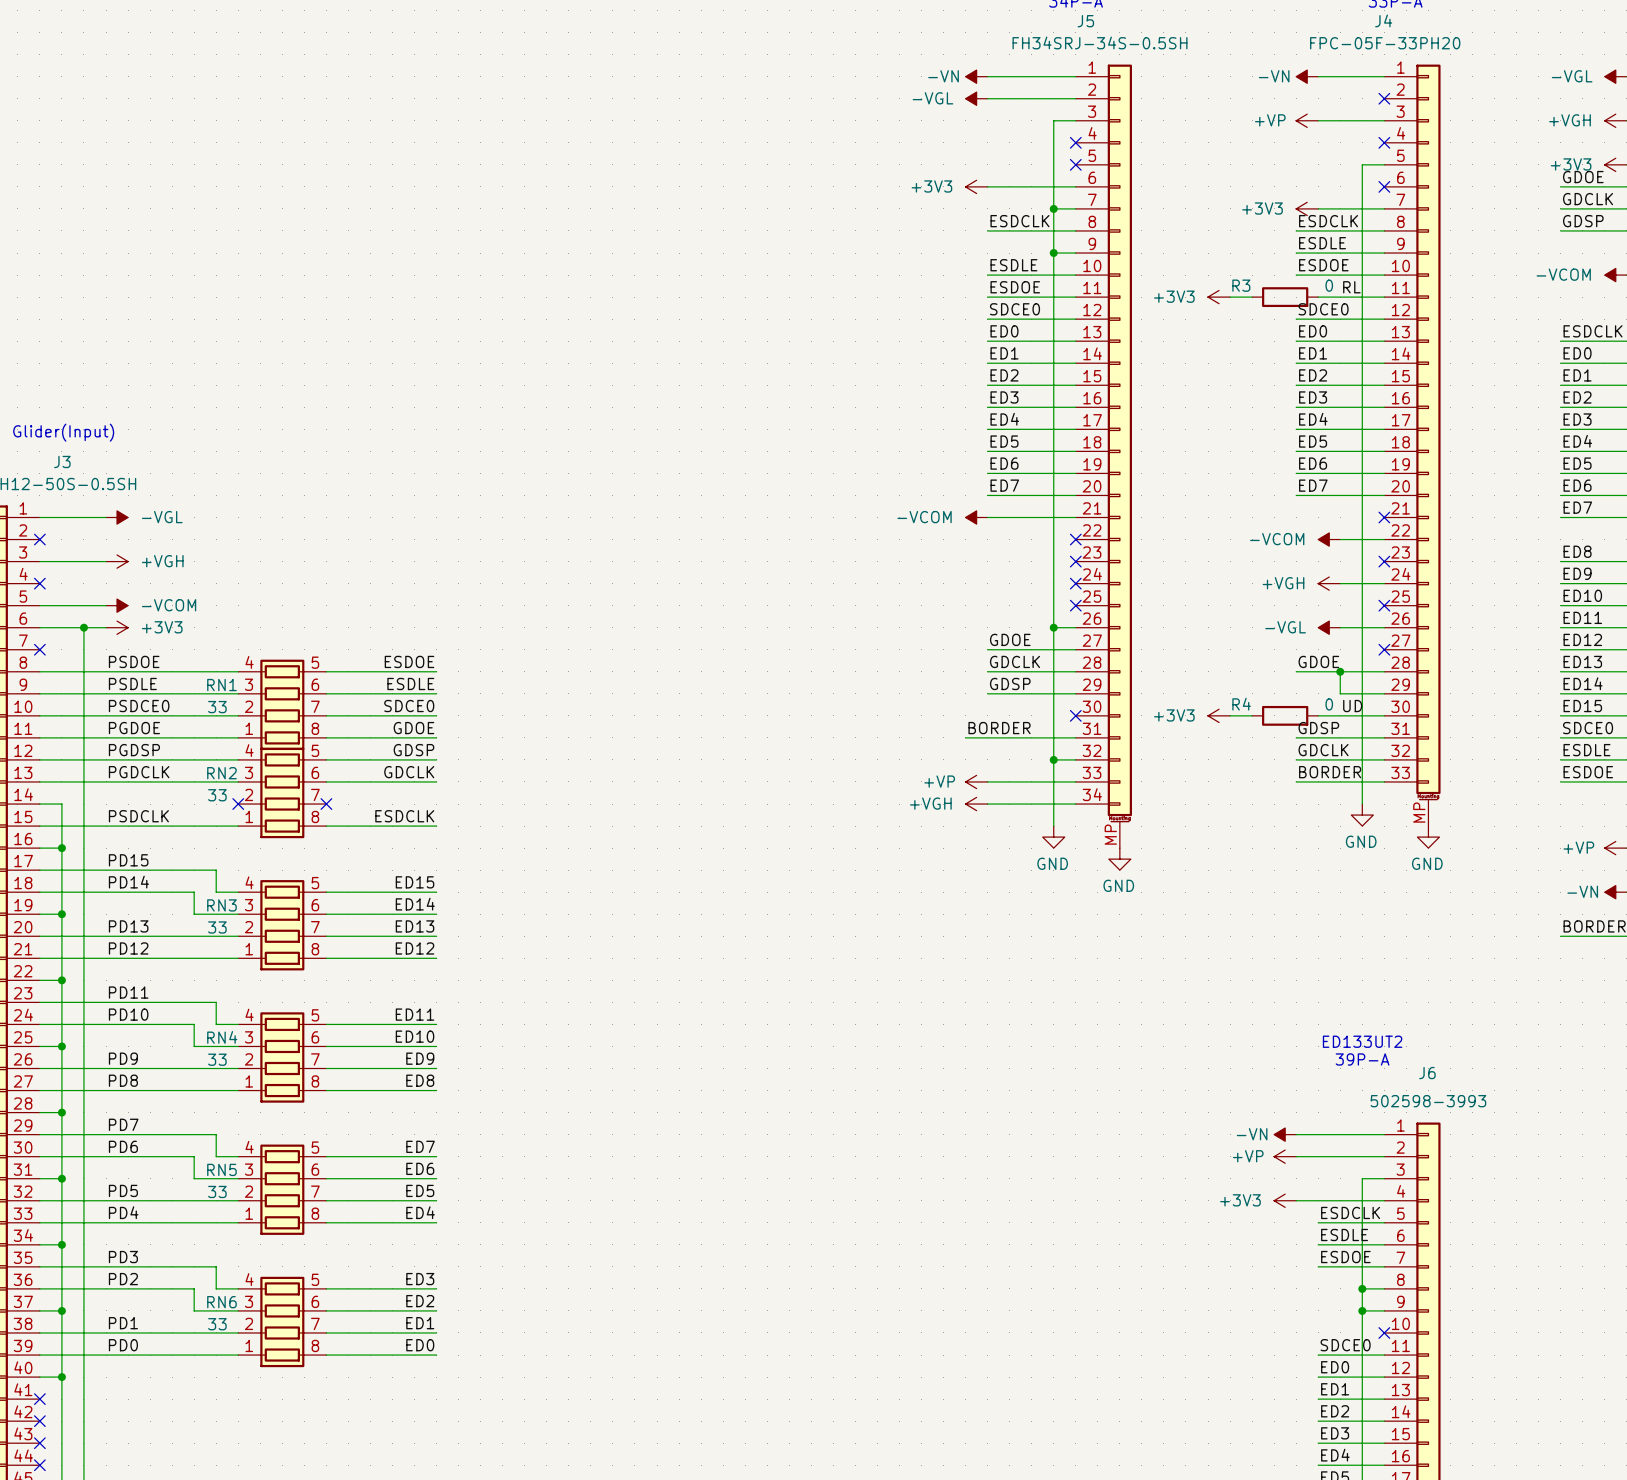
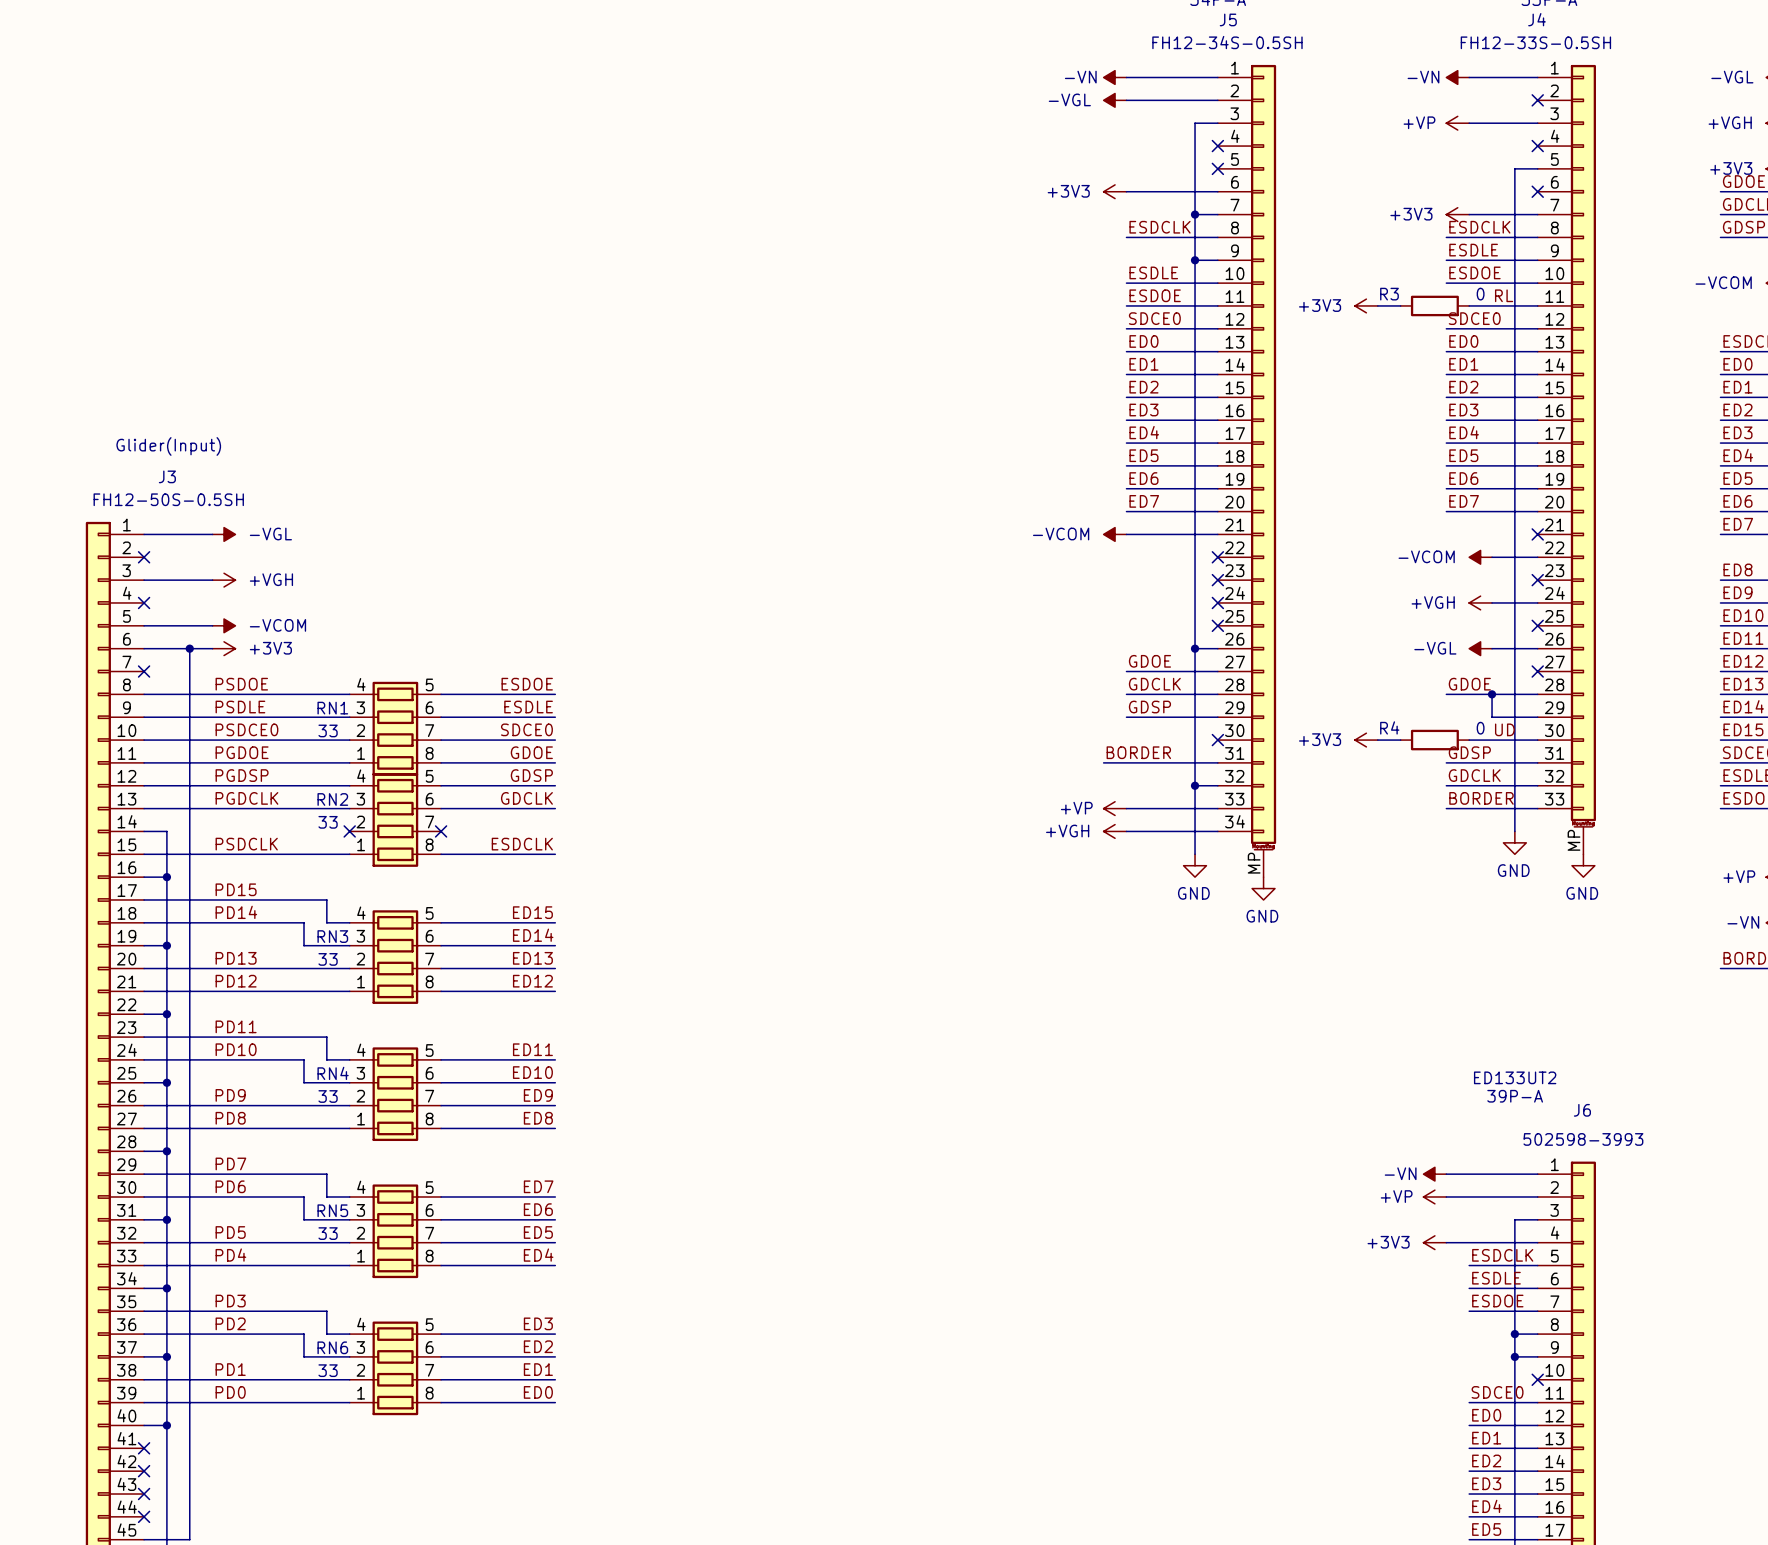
J5 value: FH34SRJ-34S-0.5SH (1100, 42) -> FH12-34S-0.5SH (1227, 42)
J4 value: FPC-05F-33PH20 (1385, 43) -> FH12-33S-0.5SH (1535, 42)

